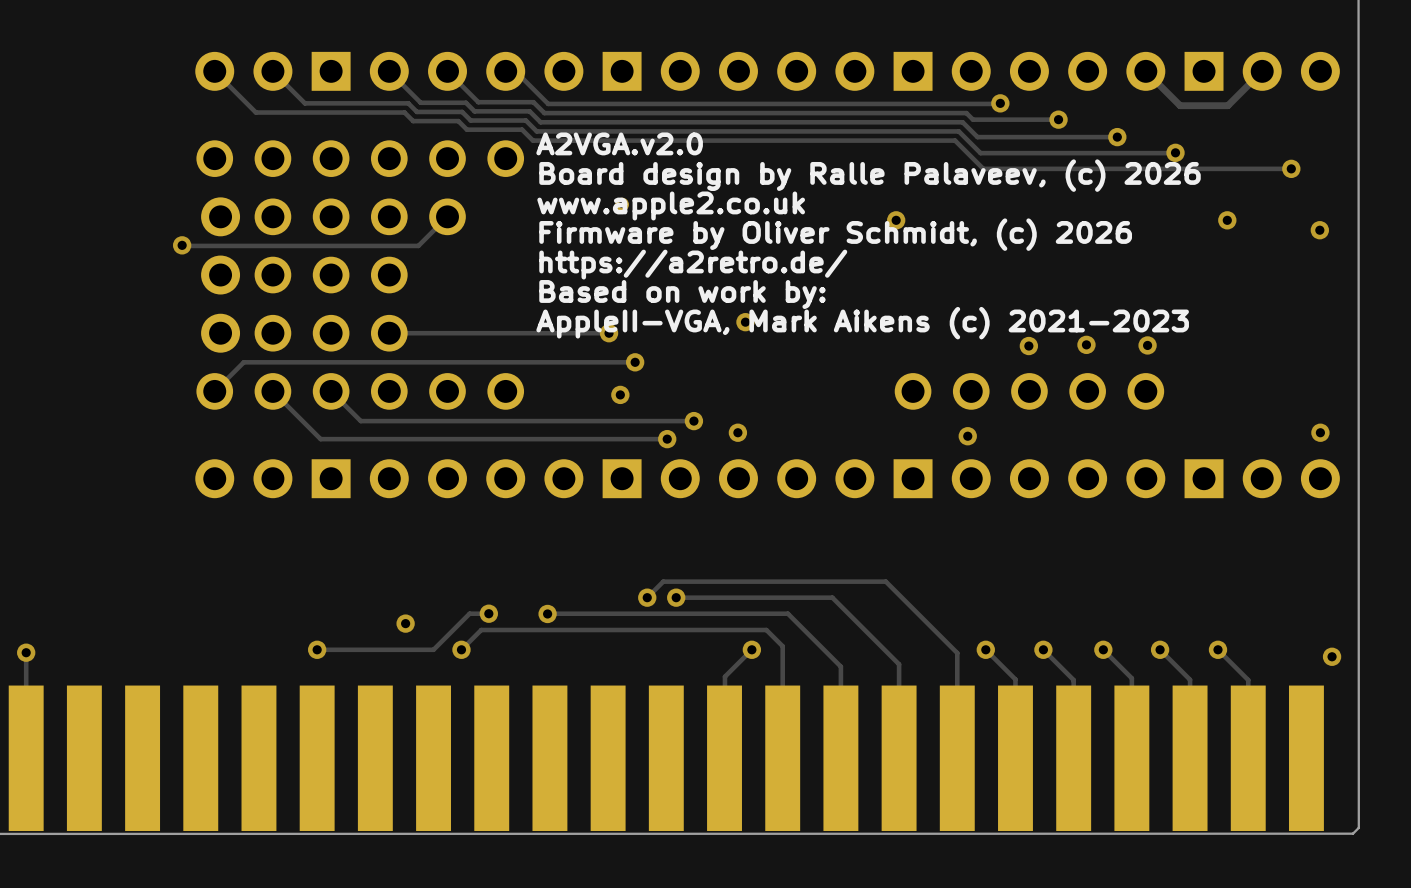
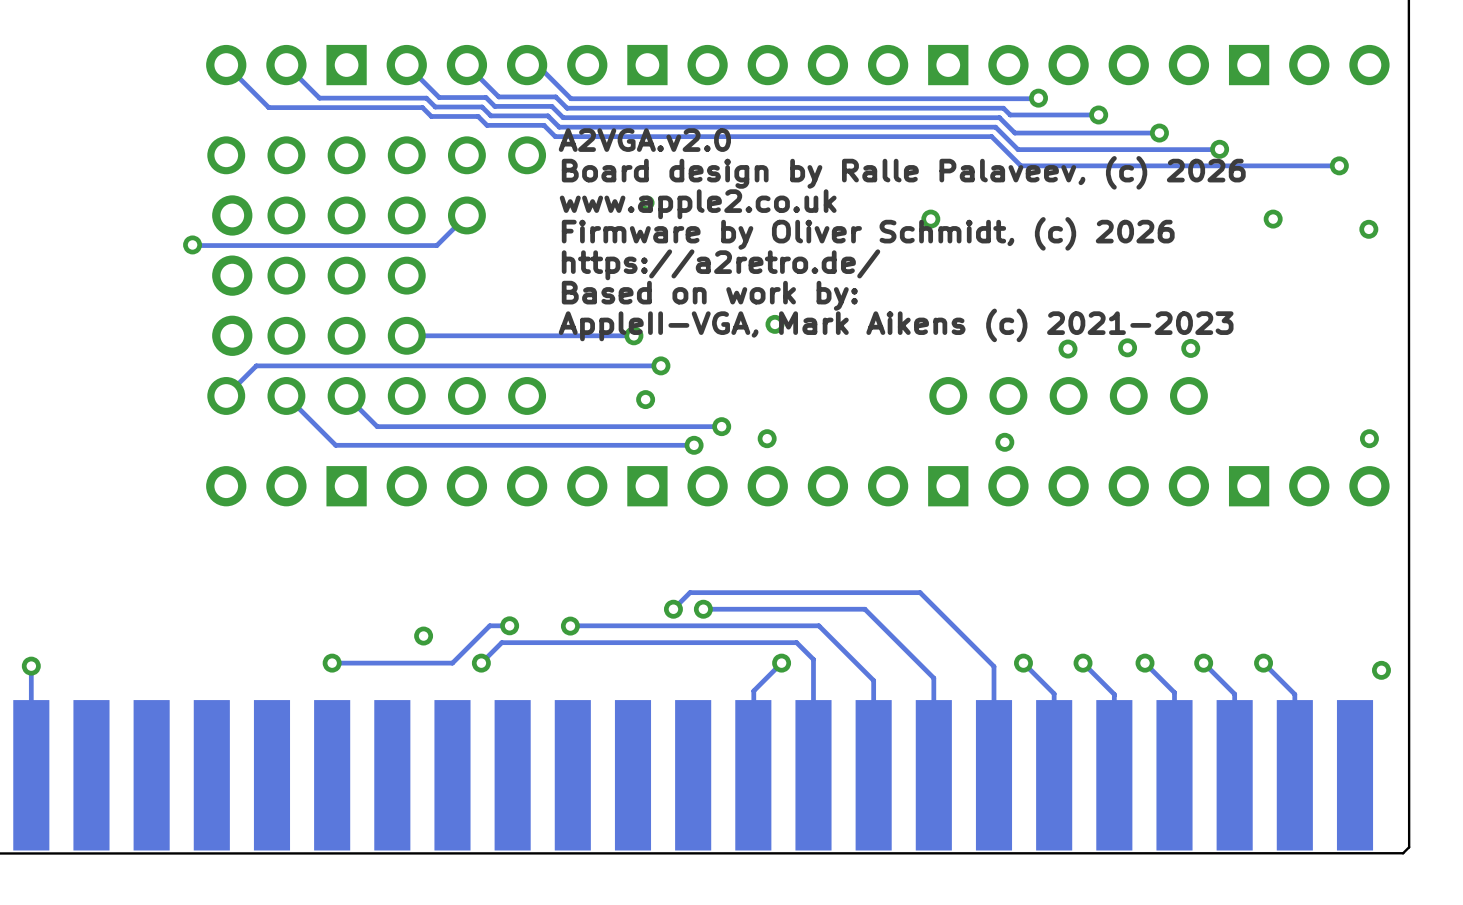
track: (1262, 71) (1227, 105) (1180, 105) (1145, 71) -> none

